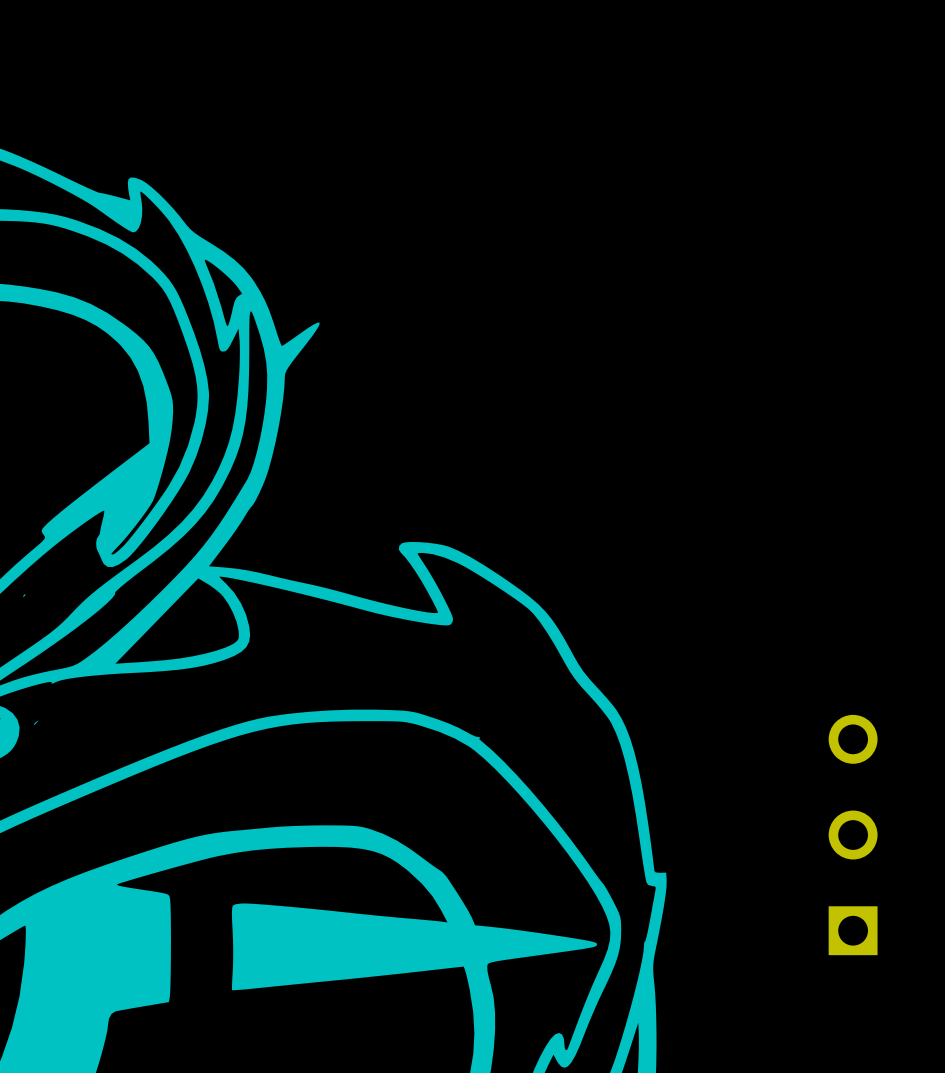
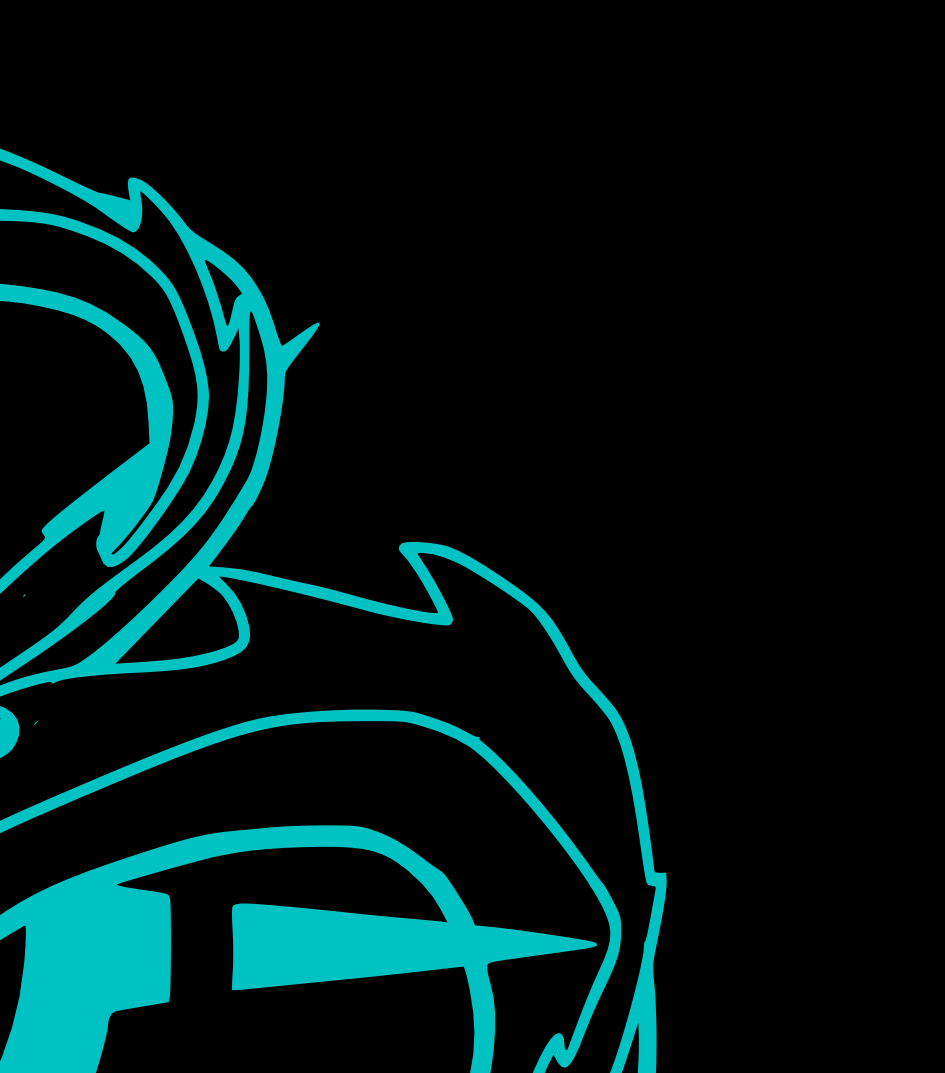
part: (853, 835) -> none

